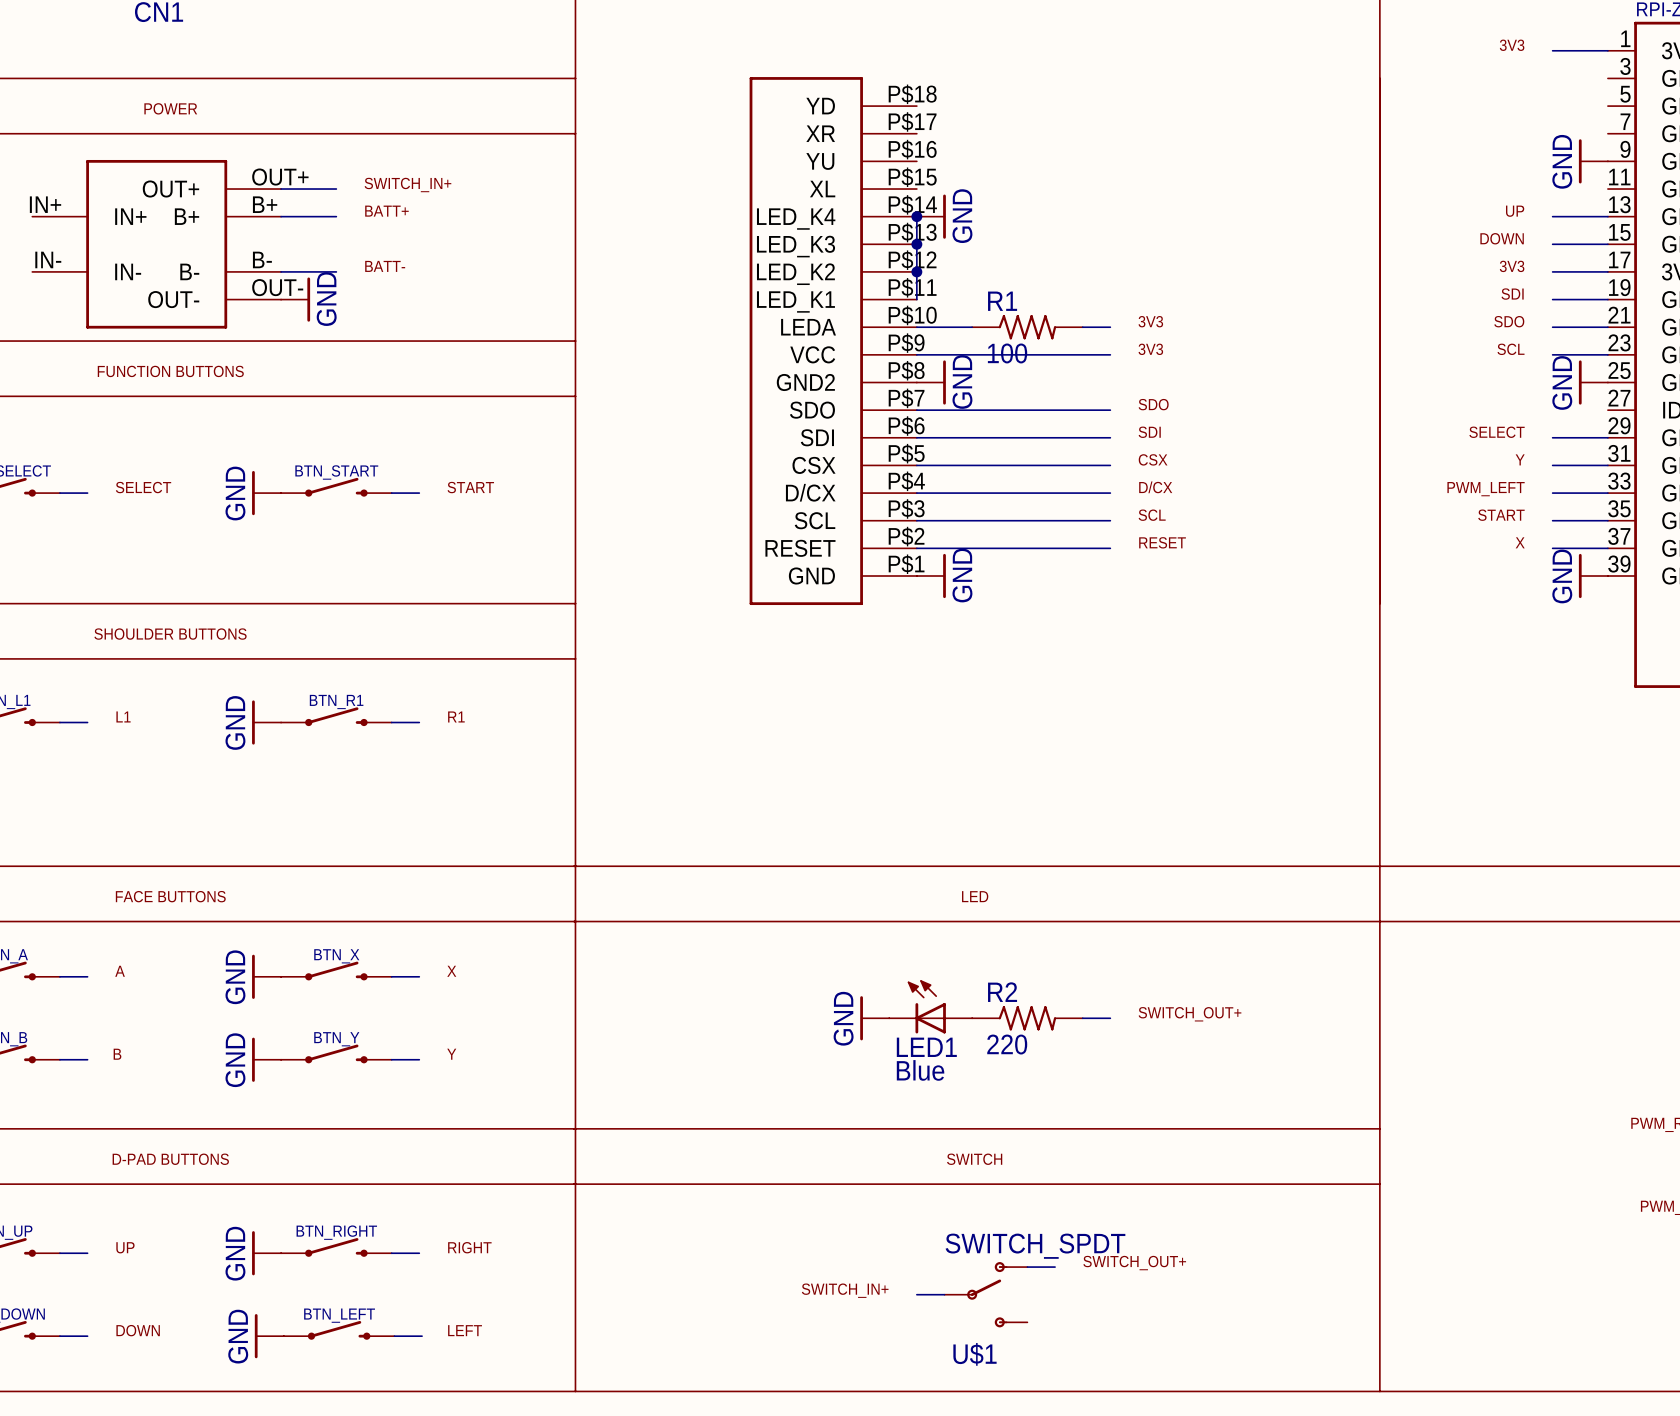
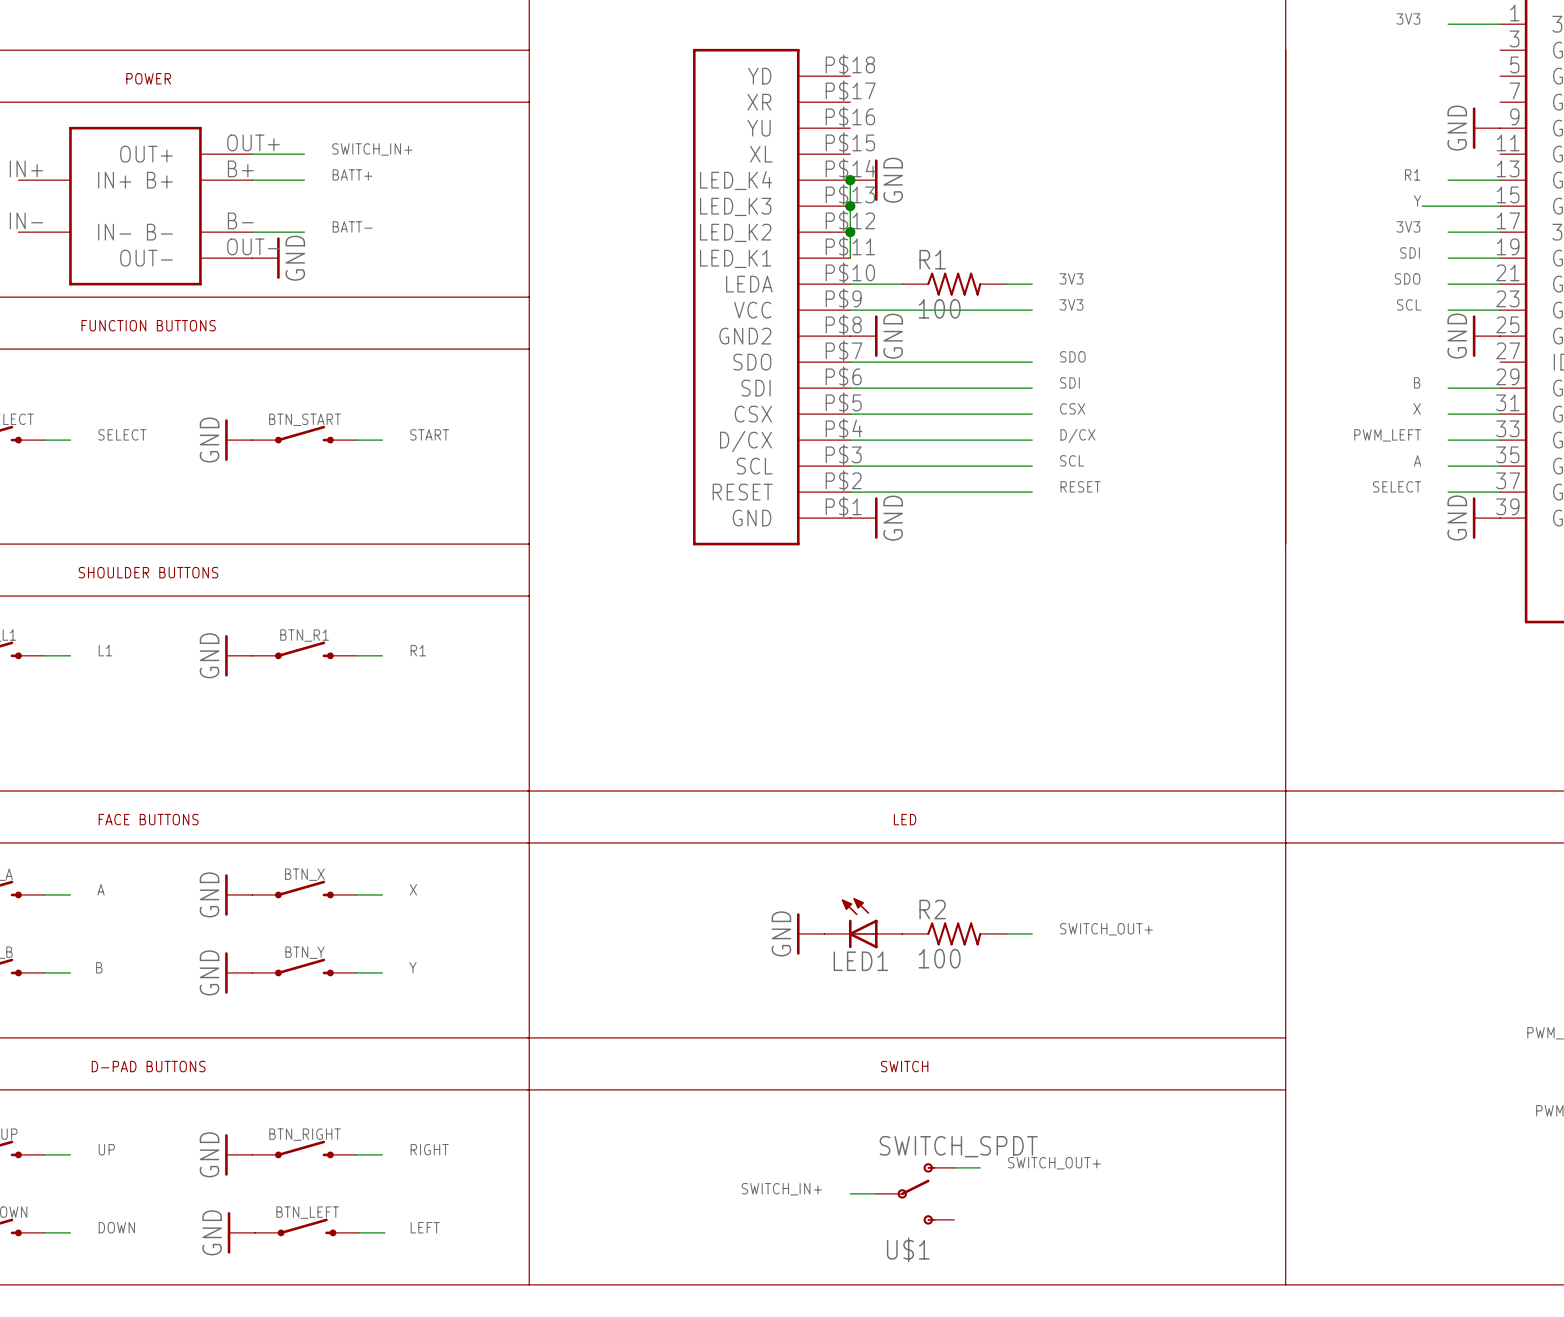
label: UP (1515, 211) -> R1 (1412, 174)
label: DOWN (1502, 238) -> Y (1417, 200)
wire: none -> (1422, 206) (1448, 206)
label: SELECT (1497, 432) -> B (1417, 382)
label: Y (1520, 459) -> X (1417, 408)
label: START (1501, 515) -> A (1417, 460)
label: X (1520, 542) -> SELECT (1397, 486)
R2 value: 220 (1007, 1044) -> 100 (939, 958)
LED1 value: Blue (920, 1070) -> none

